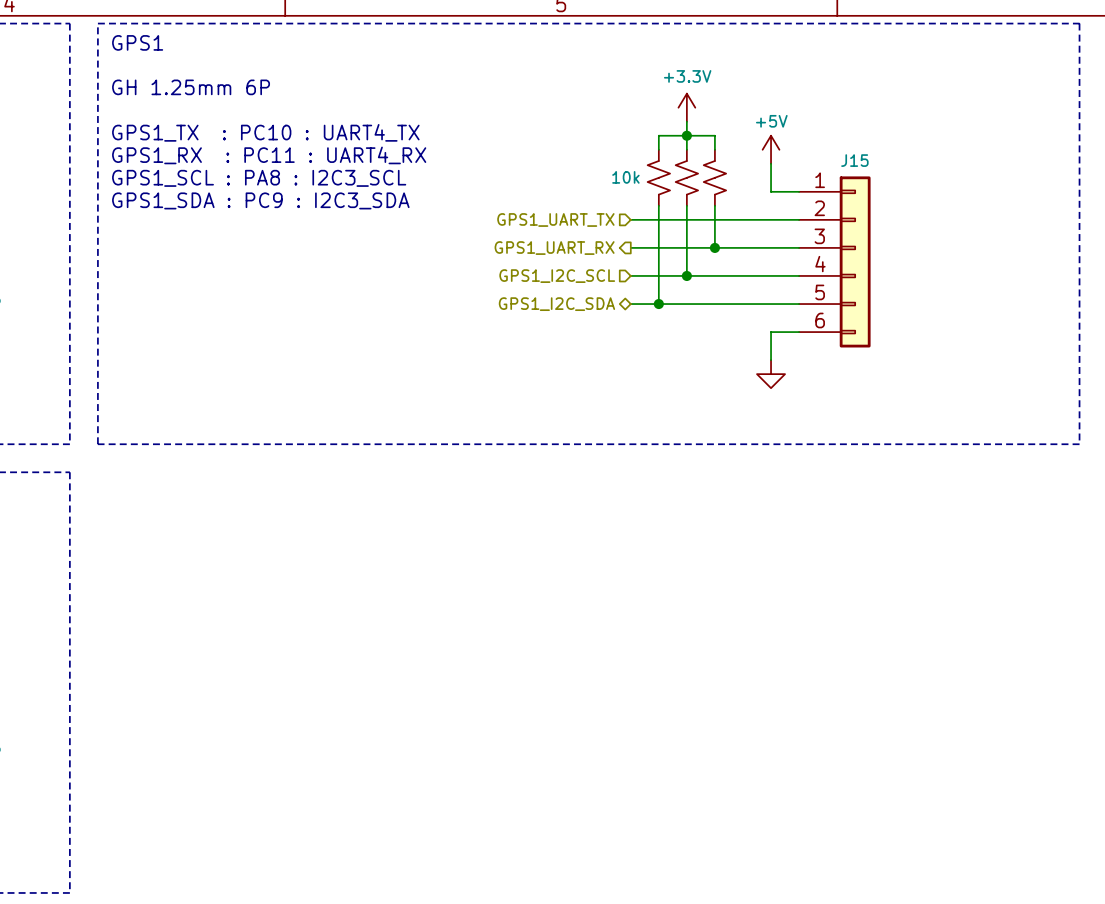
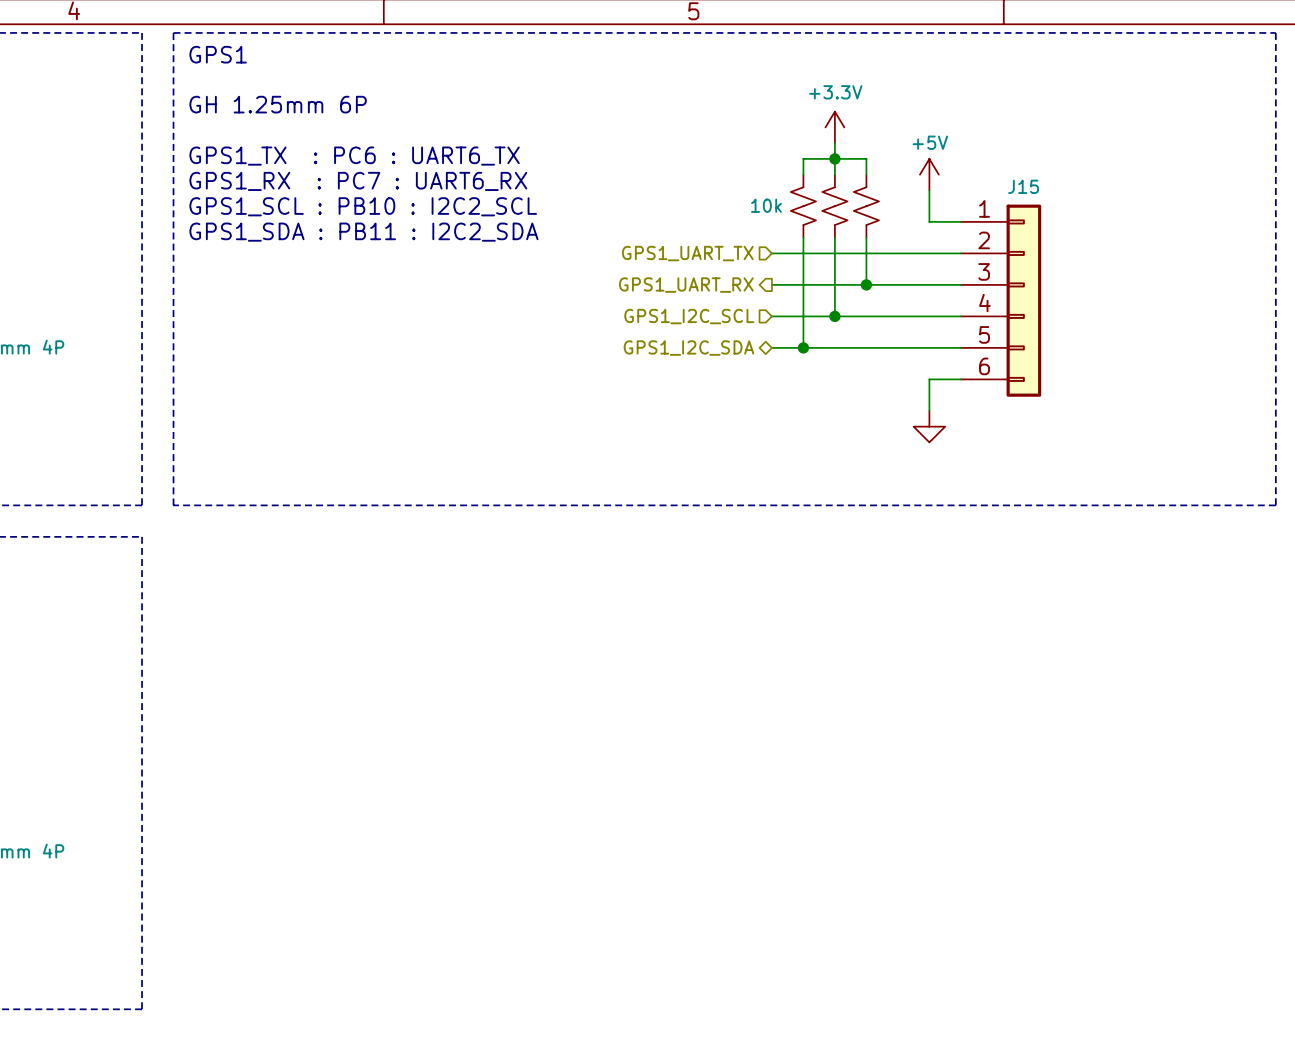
text: GPS1_TX : PC10 : UART4_TX (265, 132) -> GPS1_TX : PC6 : UART6_TX (354, 156)
text: GPS1_RX : PC11 : UART4_RX (269, 155) -> GPS1_RX : PC7 : UART6_RX (358, 181)
text: GPS1_SCL : PA8 : I2C3_SCL (259, 178) -> GPS1_SCL : PB10 : I2C2_SCL (363, 206)
text: GPS1_SDA : PC9 : I2C3_SDA (260, 200) -> GPS1_SDA : PB11 : I2C2_SDA (363, 232)

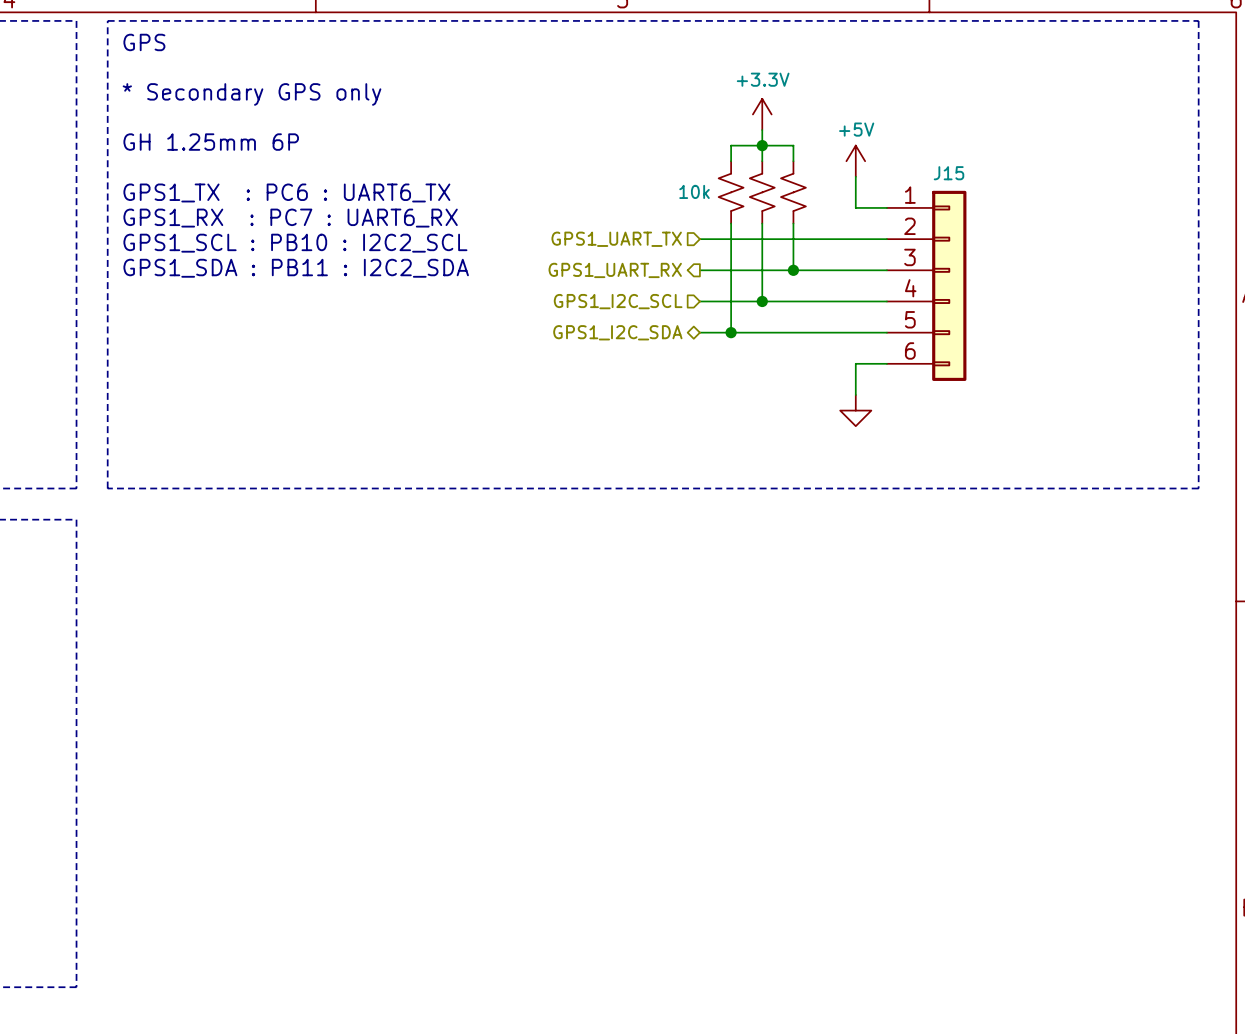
text: GPS1 (218, 54) -> GPS (144, 42)
text: GH 1.25mm 6P (278, 104) -> * Secondary GPS only (252, 94)
text: GPS1_TX : PC6 : UART6_TX (354, 156) -> GH 1.25mm 6P (211, 142)
text: GPS1_RX : PC7 : UART6_RX (358, 181) -> none
text: GPS1_SCL : PB10 : I2C2_SCL (363, 206) -> GPS1_TX : PC6 : UART6_TX (286, 192)
text: GPS1_SDA : PB11 : I2C2_SDA (363, 232) -> GPS1_RX : PC7 : UART6_RX (290, 218)
text: none -> GPS1_SCL : PB10 : I2C2_SCL (295, 243)
text: none -> GPS1_SDA : PB11 : I2C2_SDA (296, 268)

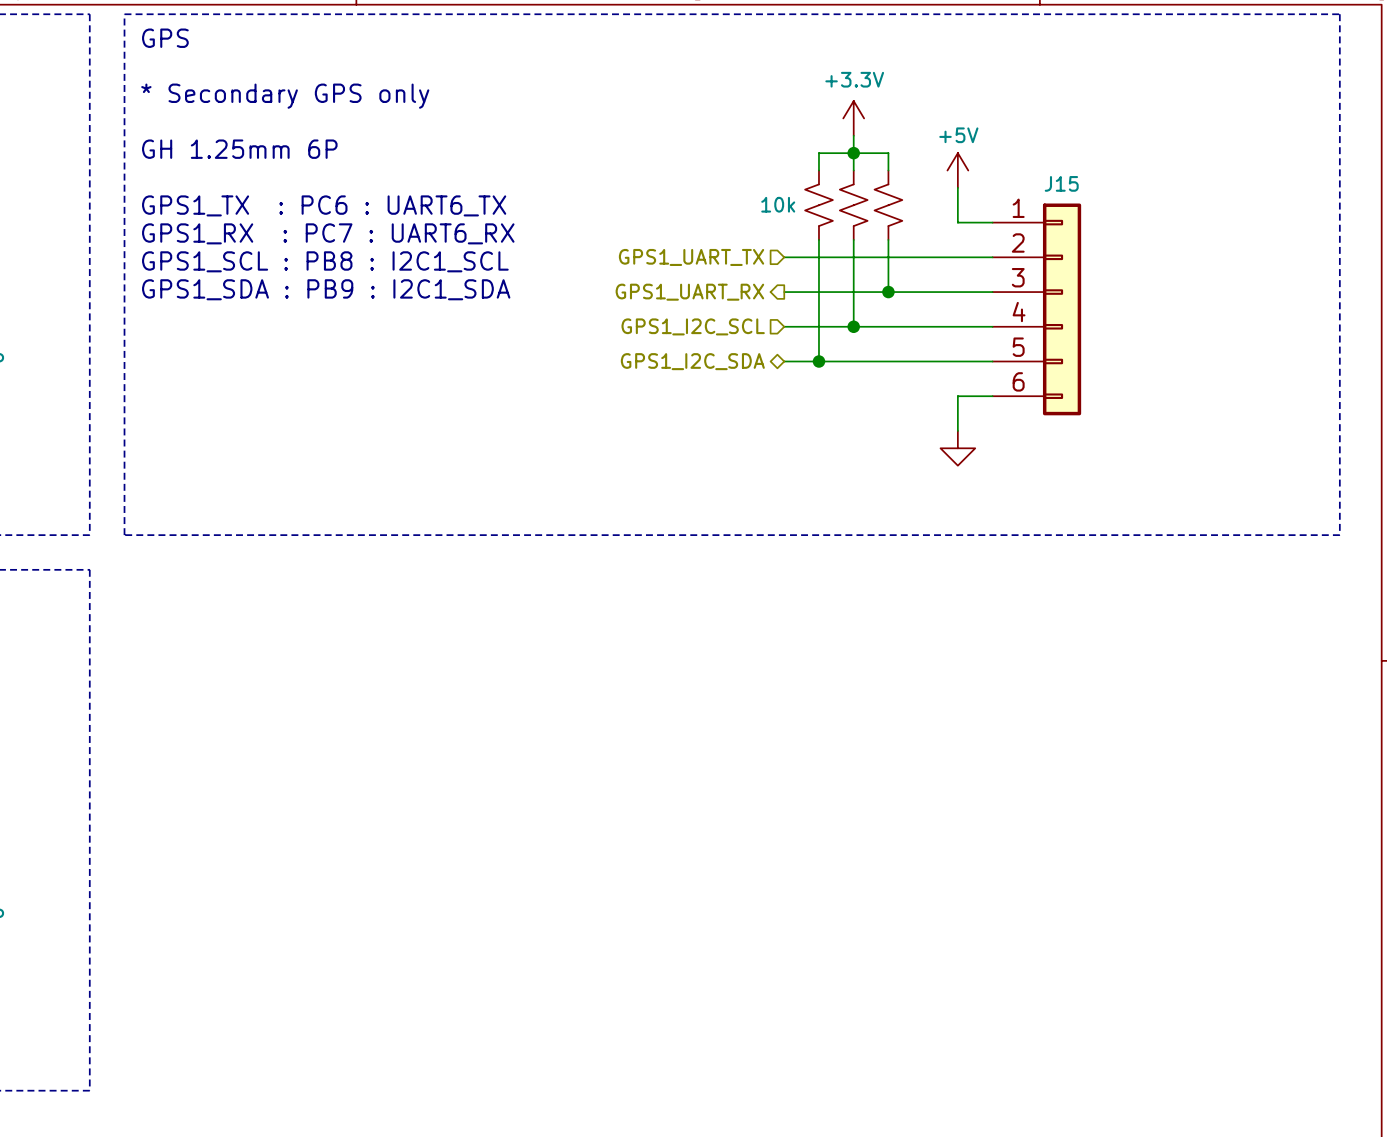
text: GPS1_SCL : PB10 : I2C2_SCL (295, 243) -> GPS1_SCL : PB8 : I2C1_SCL (325, 261)
text: GPS1_SDA : PB11 : I2C2_SDA (296, 268) -> GPS1_SDA : PB9 : I2C1_SDA (326, 289)

